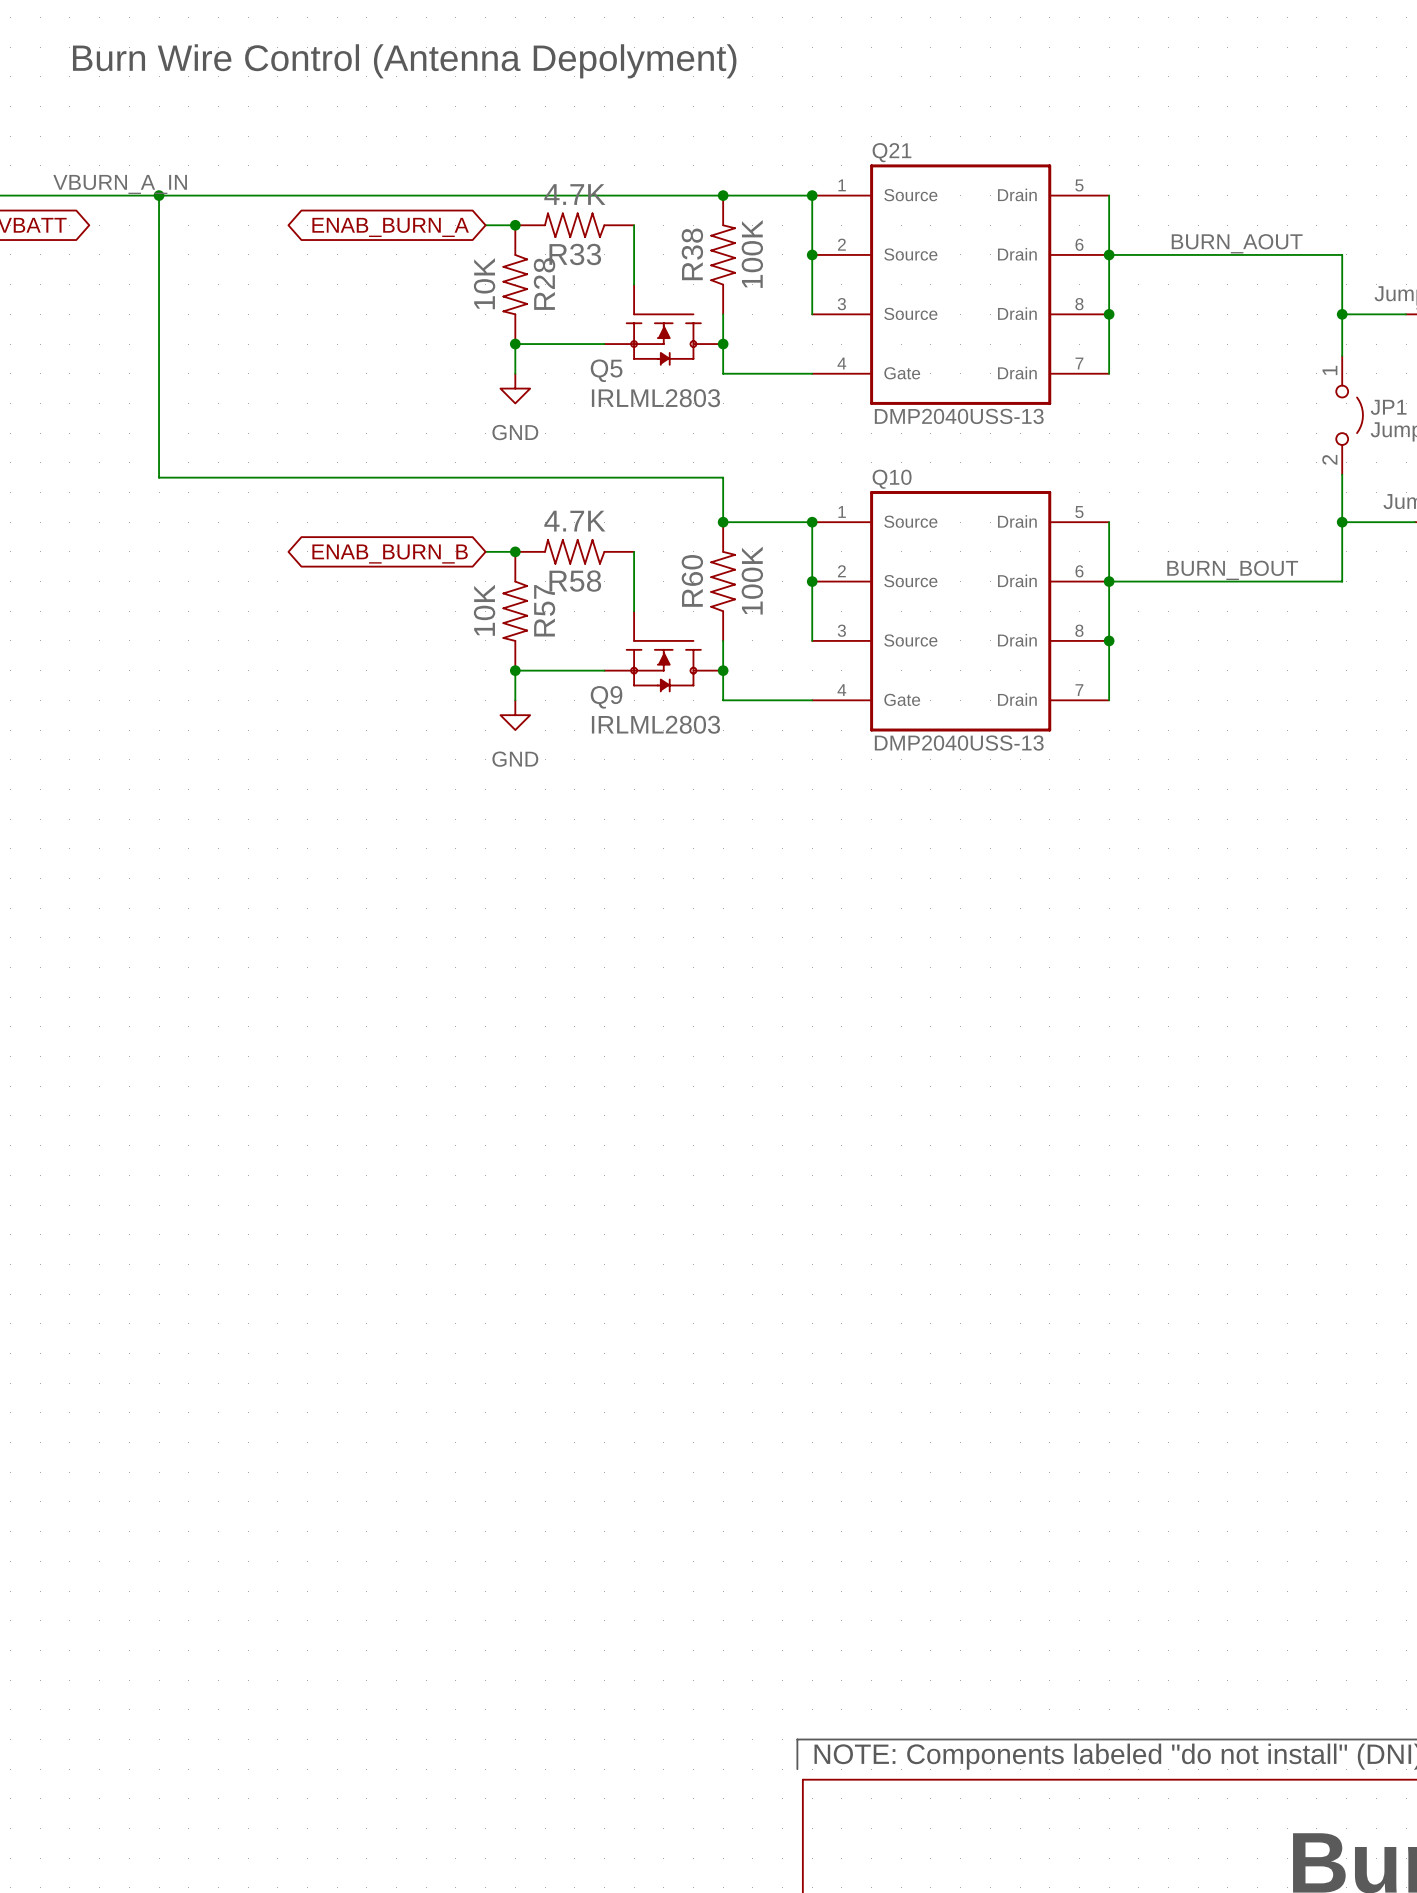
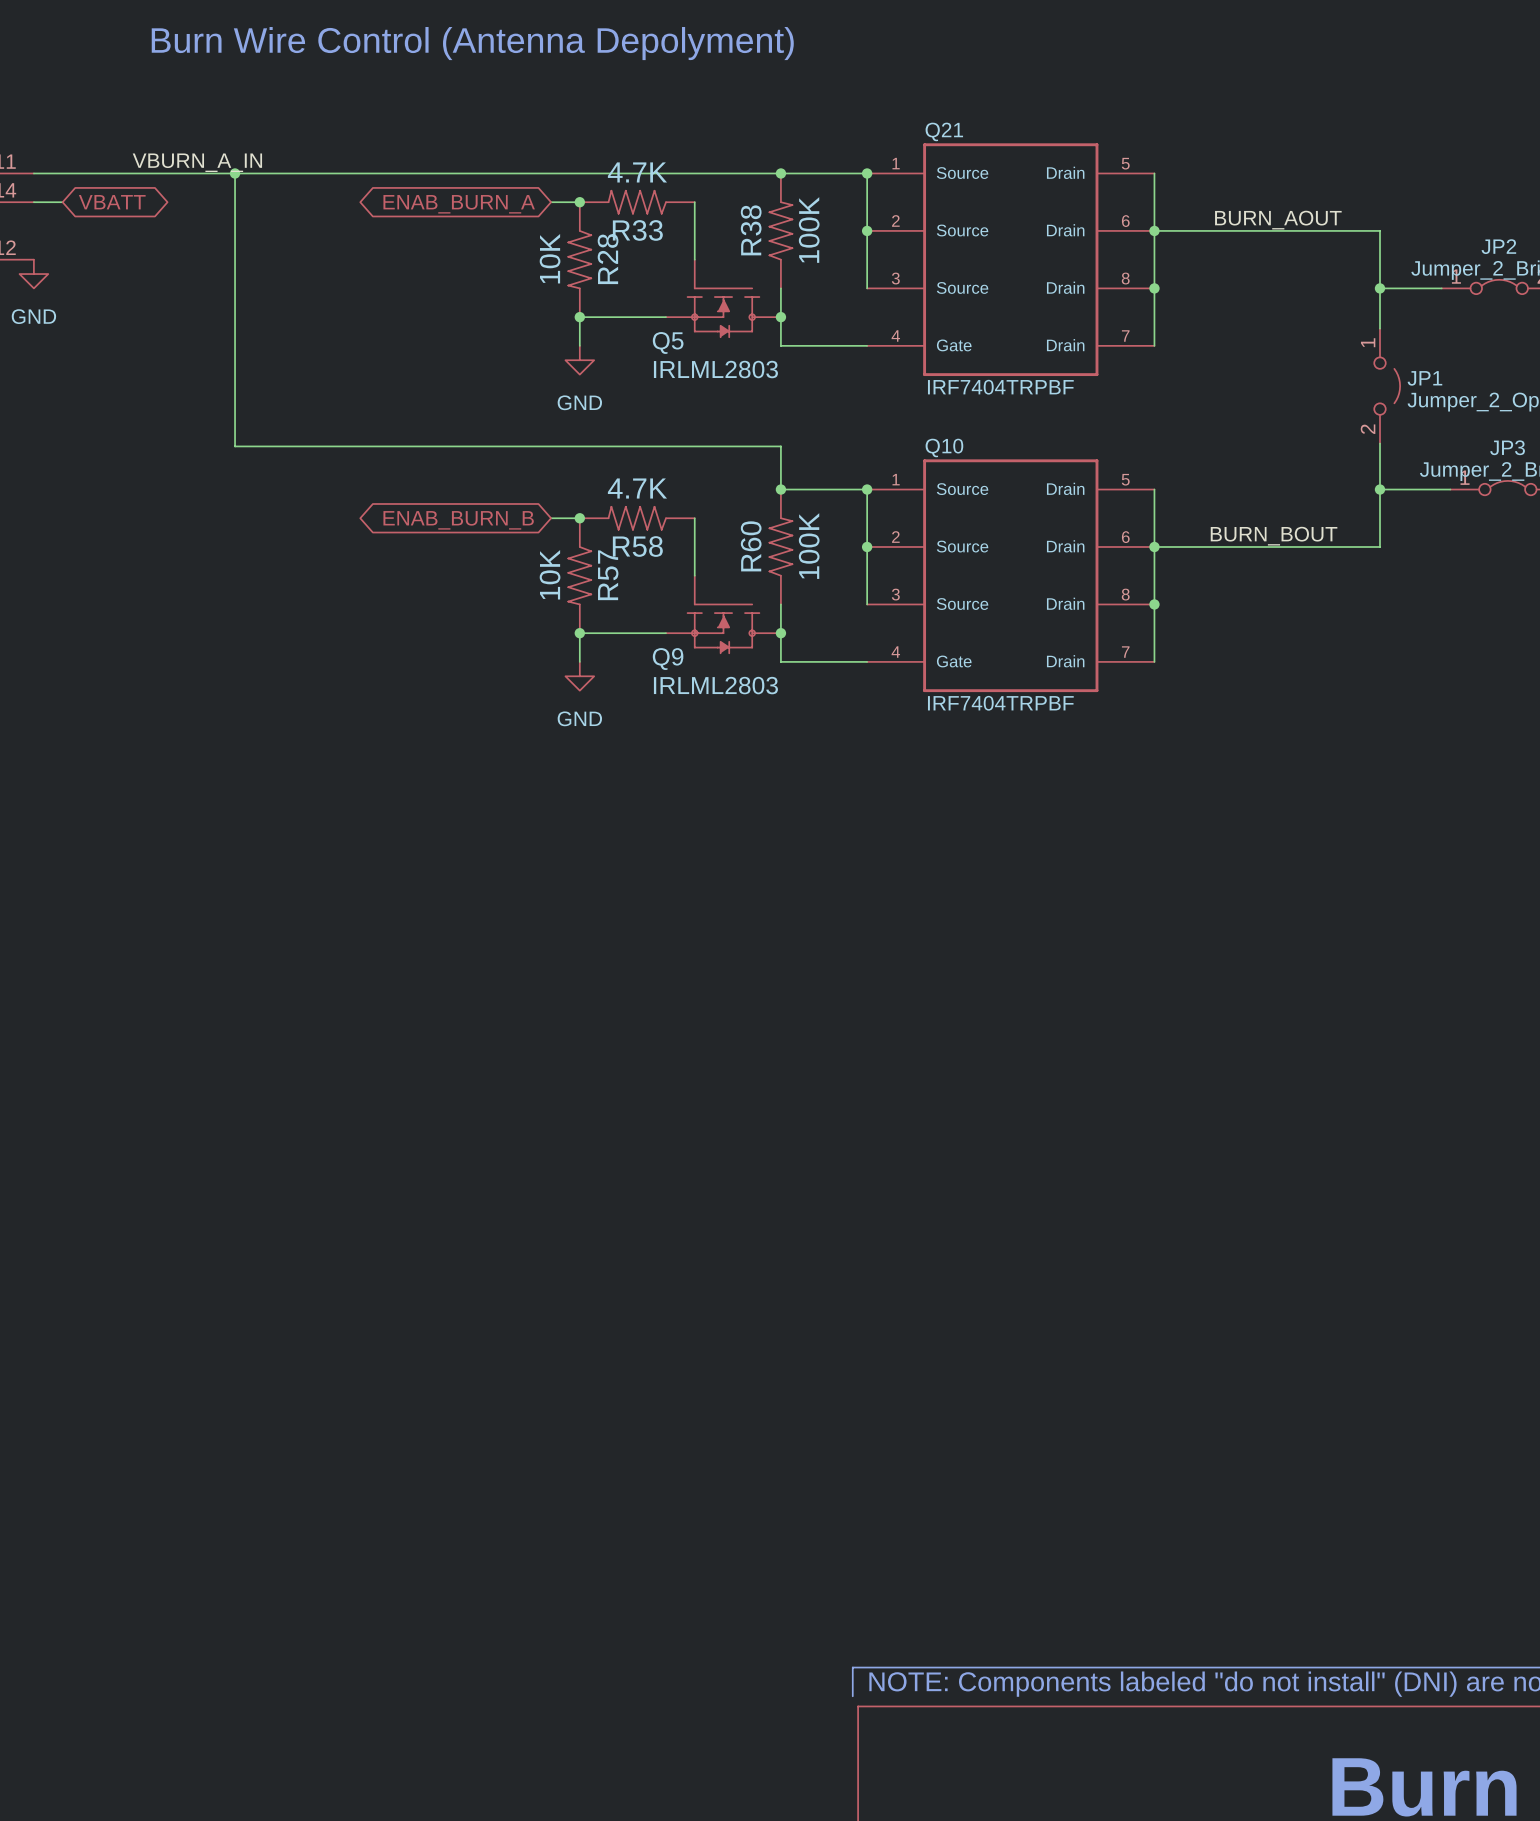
Q21 value: DMP2040USS-13 (959, 416) -> IRF7404TRPBF (1000, 387)
Q10 value: DMP2040USS-13 (959, 743) -> IRF7404TRPBF (1000, 703)

